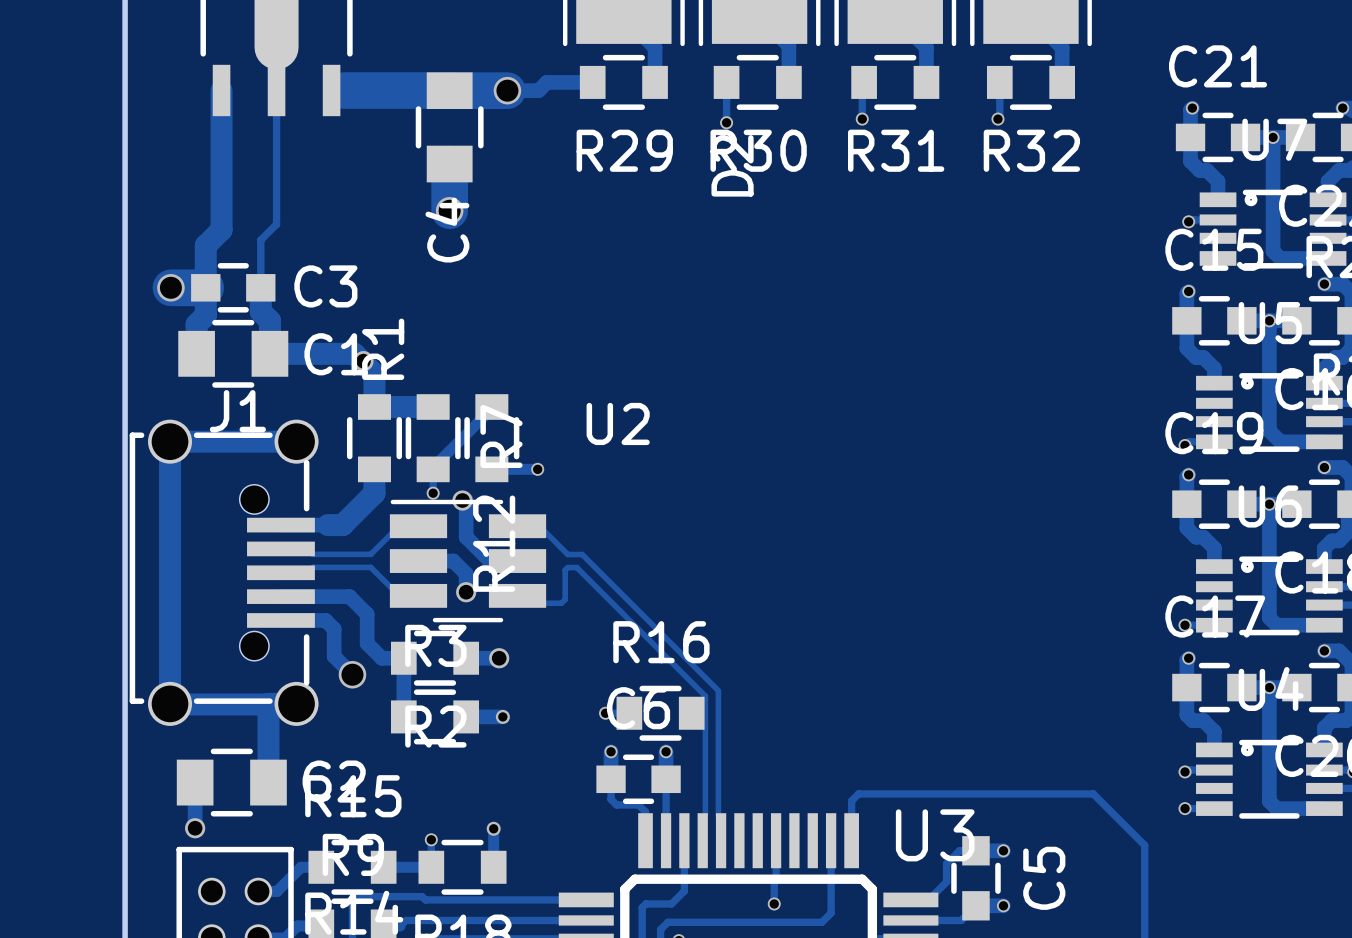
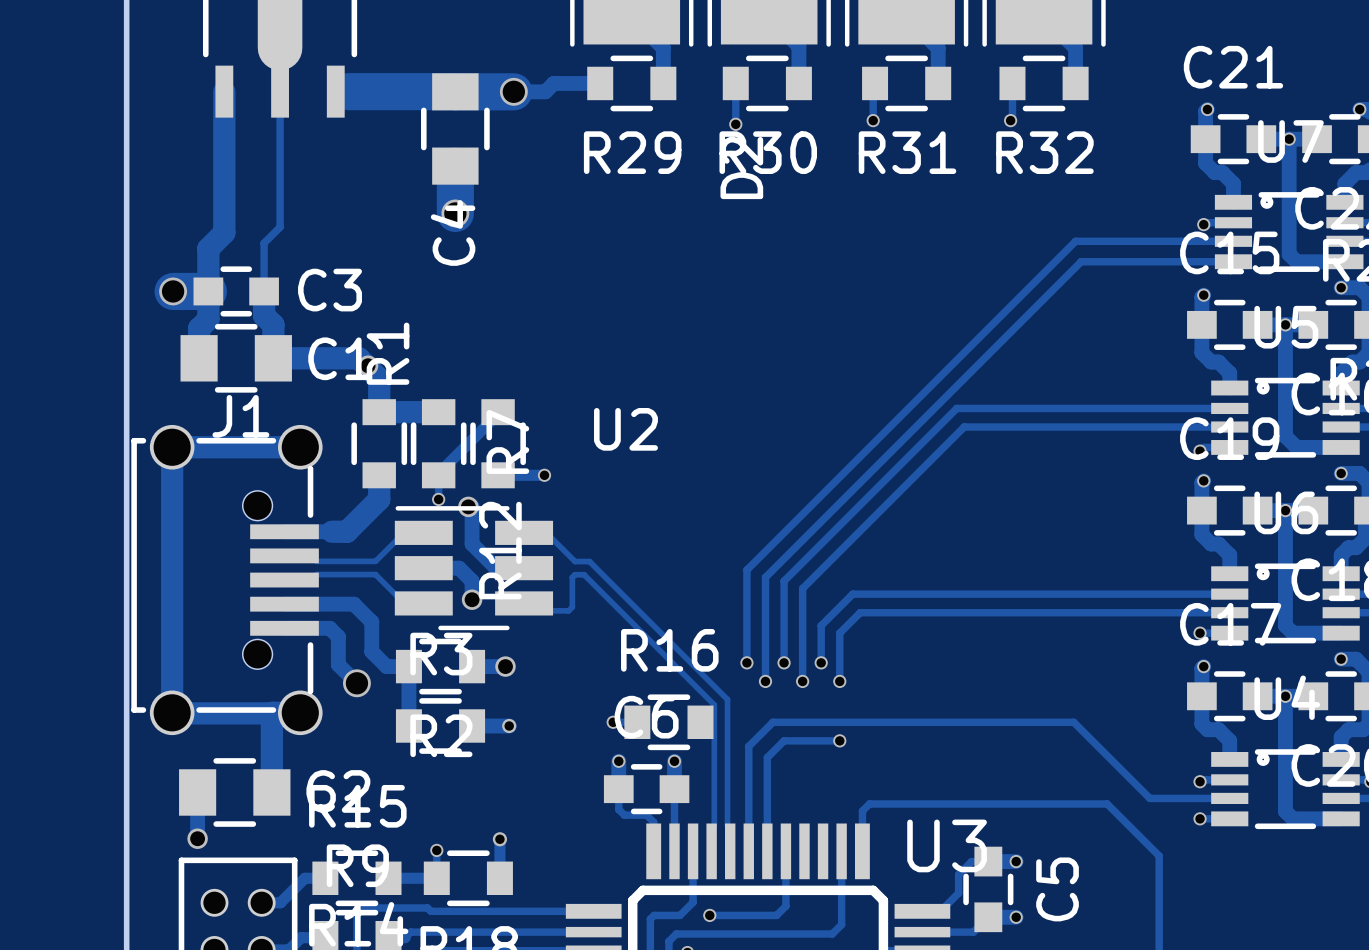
track: none -> (1233, 241) (1075, 241) (746, 570) (746, 662)
track: none -> (1233, 261) (1081, 261) (765, 577) (765, 681)
track: none -> (1229, 408) (956, 408) (784, 581) (784, 662)
track: none -> (1229, 427) (964, 427) (802, 588) (802, 681)
track: none -> (1229, 594) (852, 594) (821, 625) (821, 662)
track: none -> (1229, 612) (860, 612) (839, 633) (839, 681)
via: none -> (746, 662)
via: none -> (784, 662)
via: none -> (821, 662)
via: none -> (765, 681)
via: none -> (802, 681)
via: none -> (839, 681)
track: none -> (839, 740) (784, 740) (767, 757) (767, 851)
via: none -> (839, 740)
track: none -> (1229, 798) (1149, 798) (1073, 722) (772, 722) (748, 746) (748, 851)
track: (776, 880) (774, 881) (774, 903) -> (785, 891) (785, 906) (776, 915) (709, 915)
via position: (774, 903) -> (709, 915)

